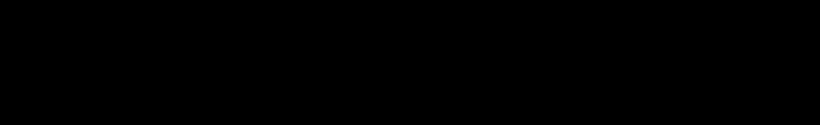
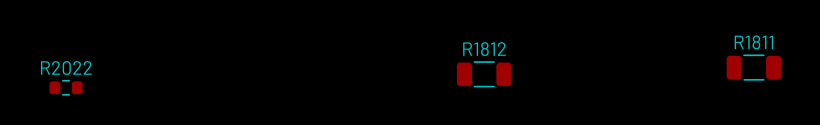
R1811: none -> (753, 67)
R1812: none -> (484, 74)
R2022: none -> (66, 87)

